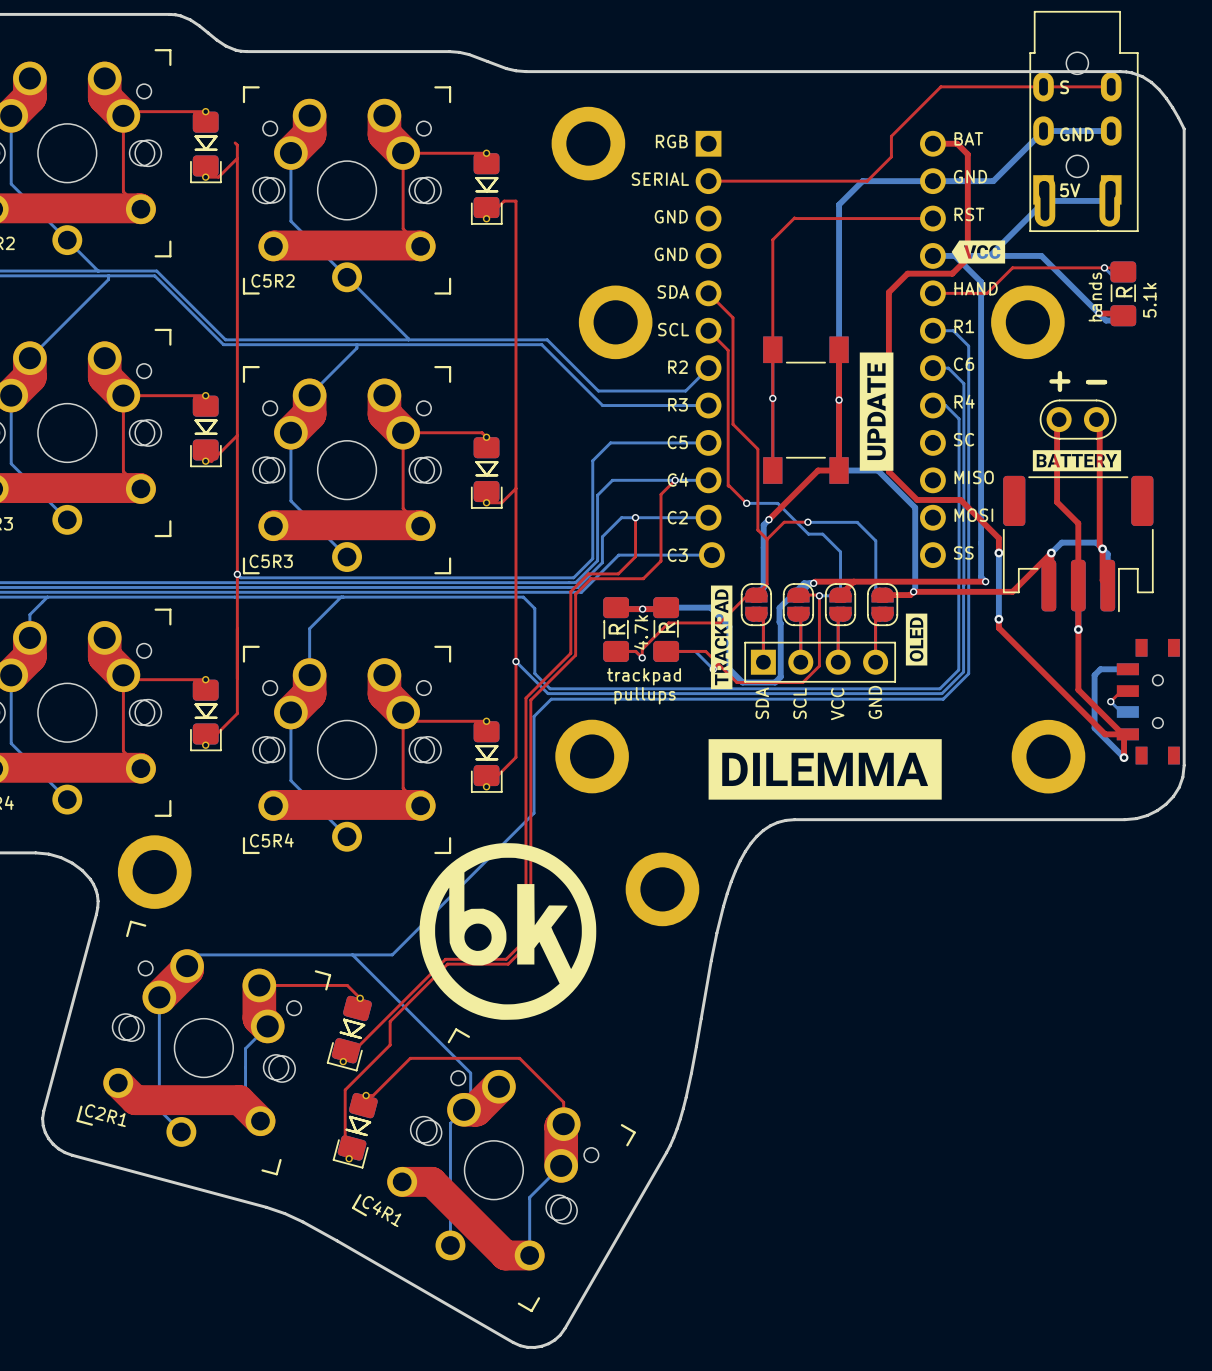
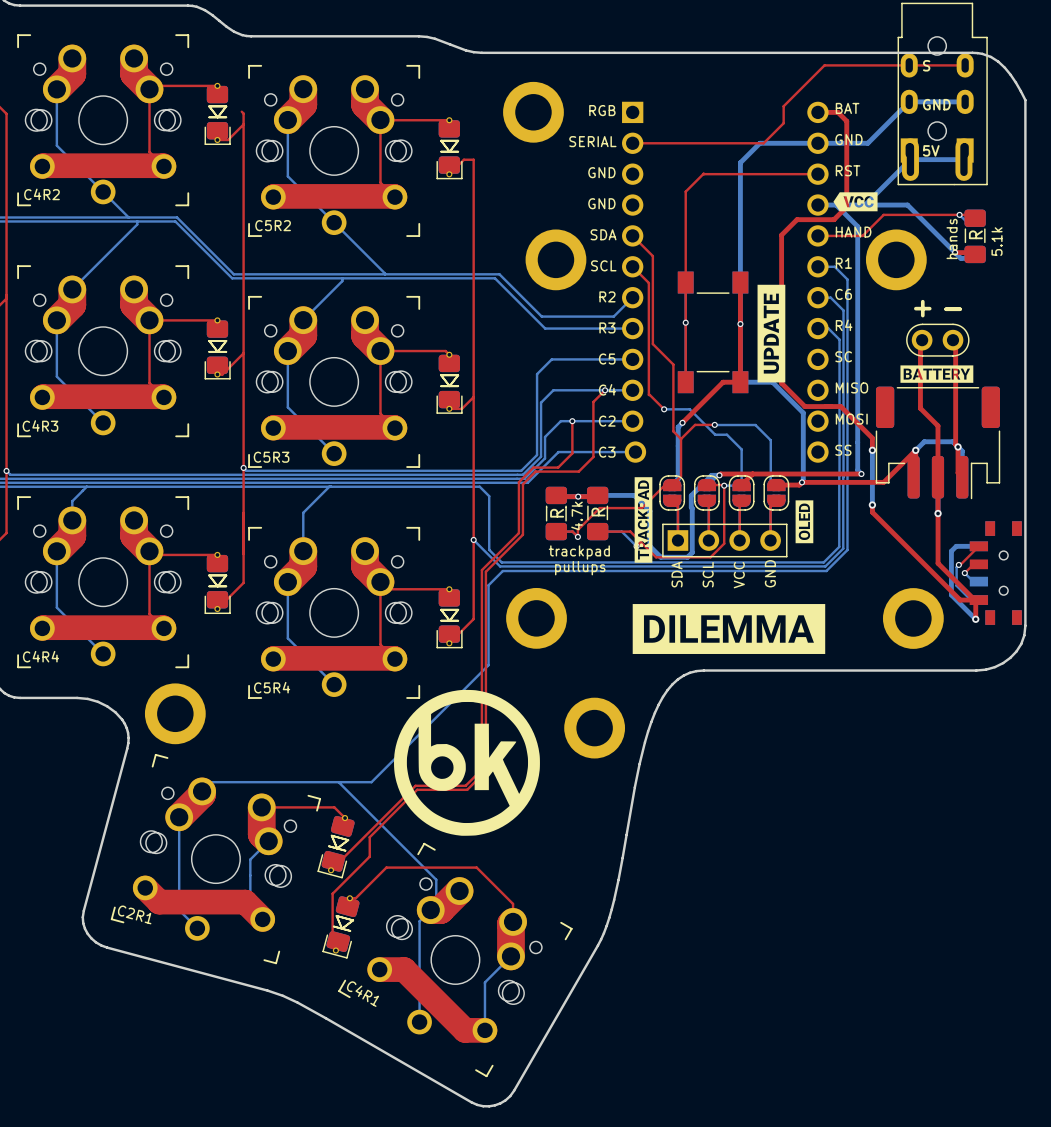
top track: none -> (978, 546) (958, 564)
bottom track: none -> (958, 564) (956, 567) (956, 585) (970, 600) (978, 600)
via: none -> (958, 564)

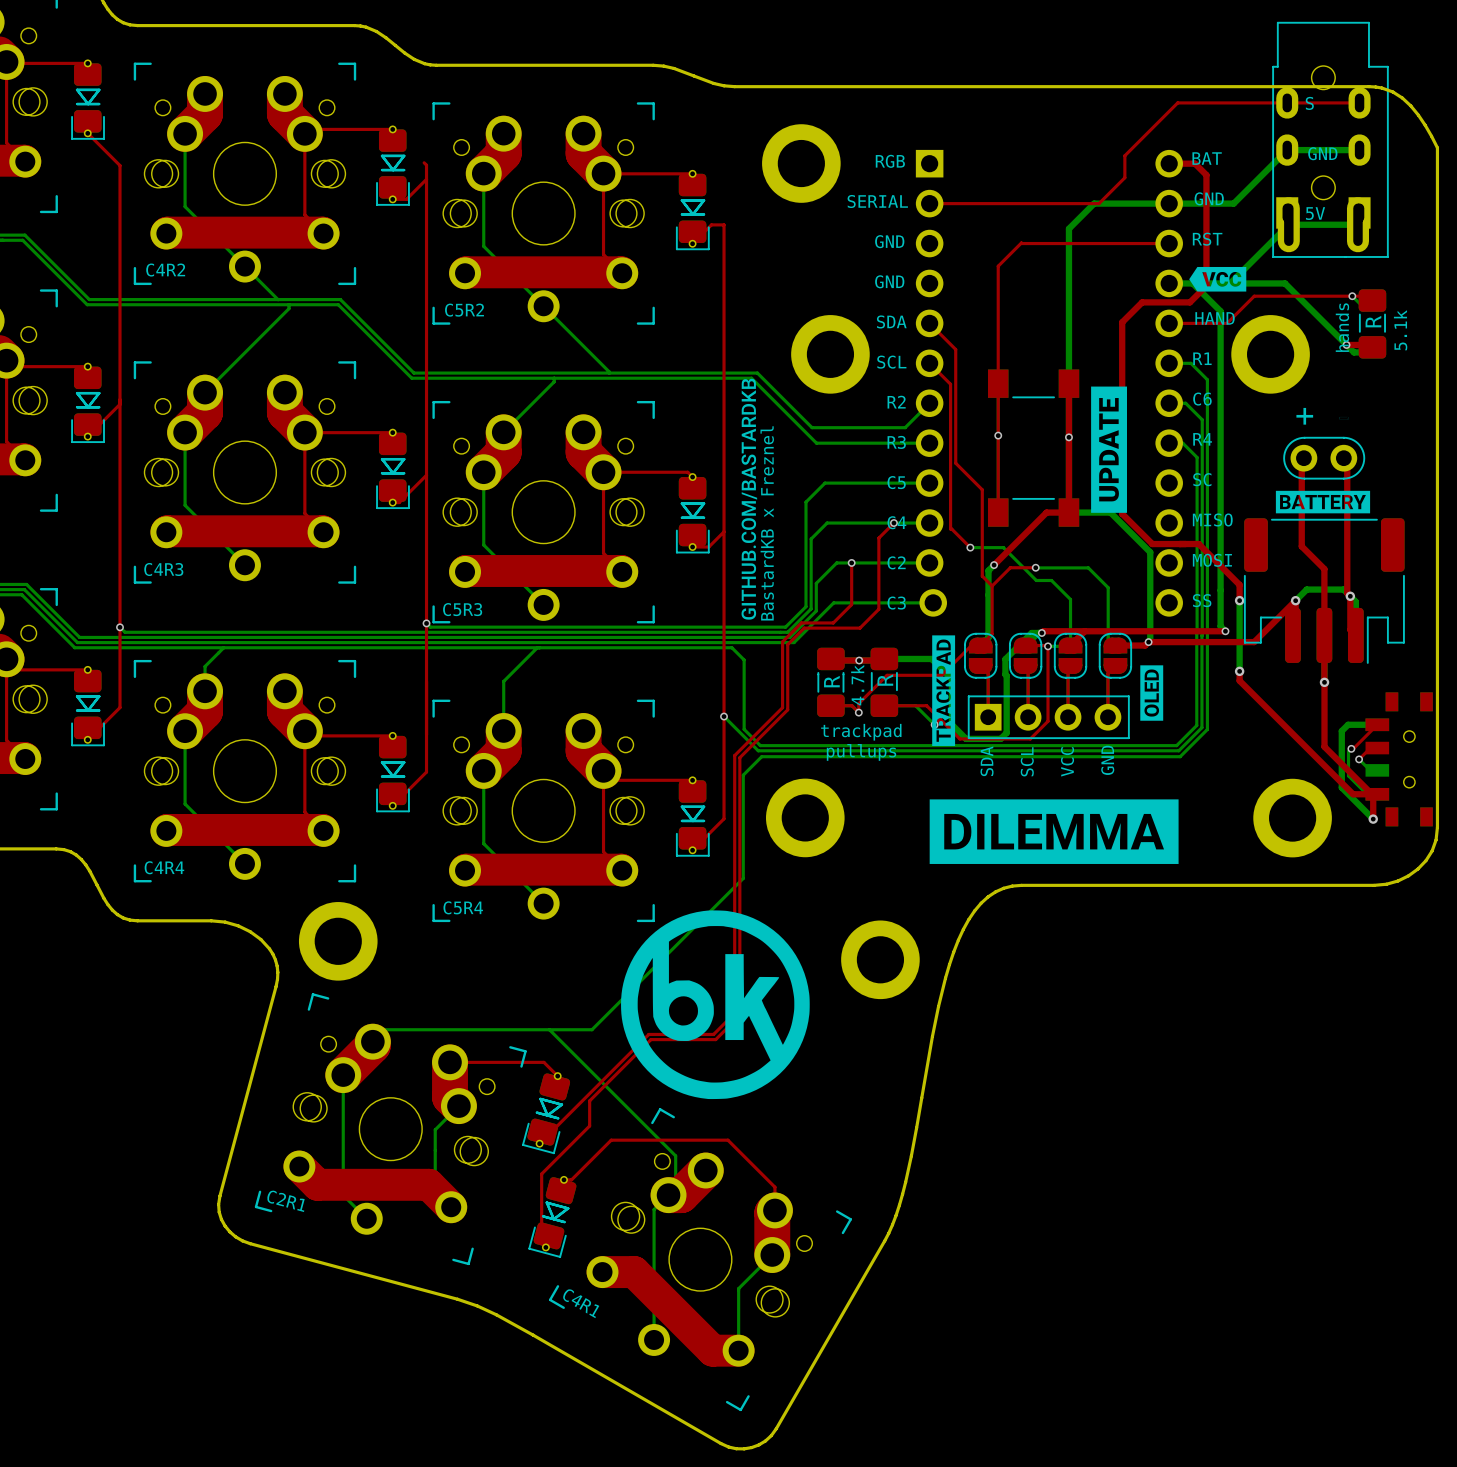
drawing: none -> [741, 378, 758, 620]
text: none -> BastardKB x Freznel (767, 523)

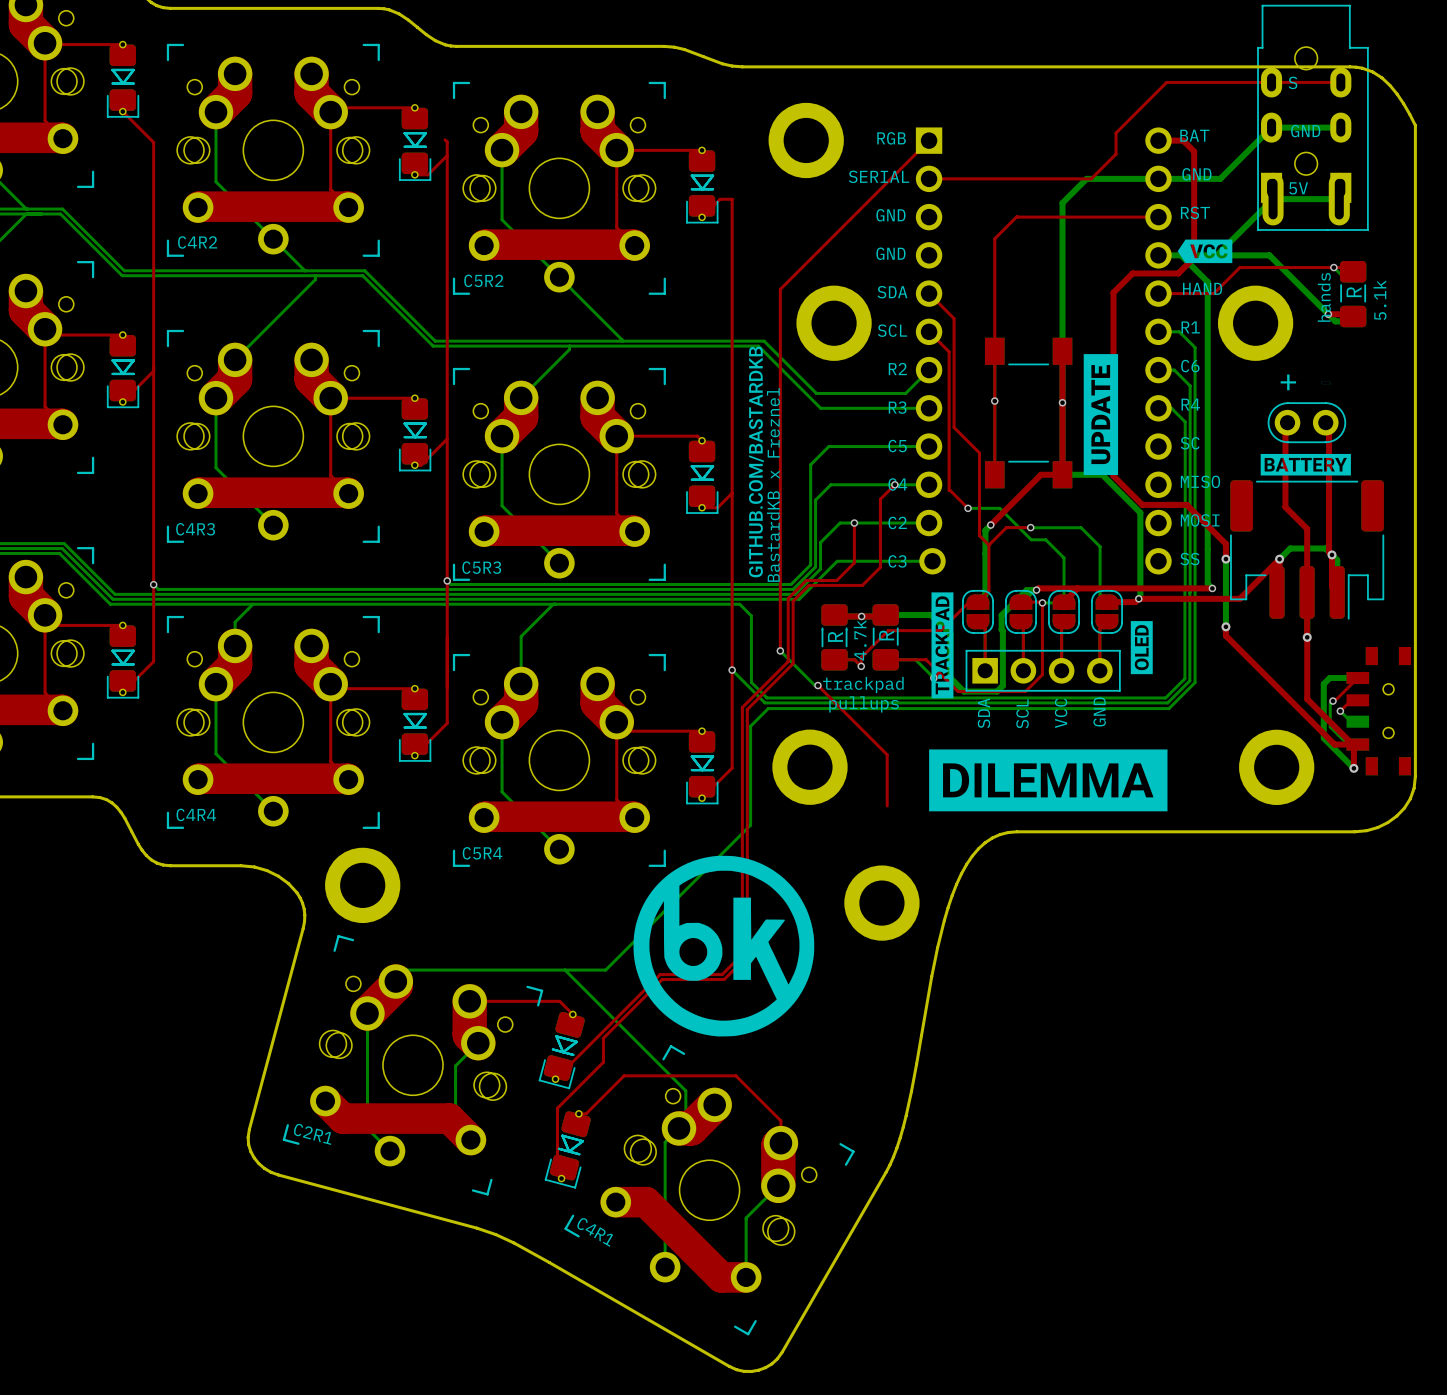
top track: none -> (929, 140) (780, 289) (780, 650)
bottom track: none -> (780, 650) (814, 685) (817, 685)
via: none -> (780, 650)
top track: none -> (817, 685) (887, 754) (887, 805)
via: none -> (817, 685)

